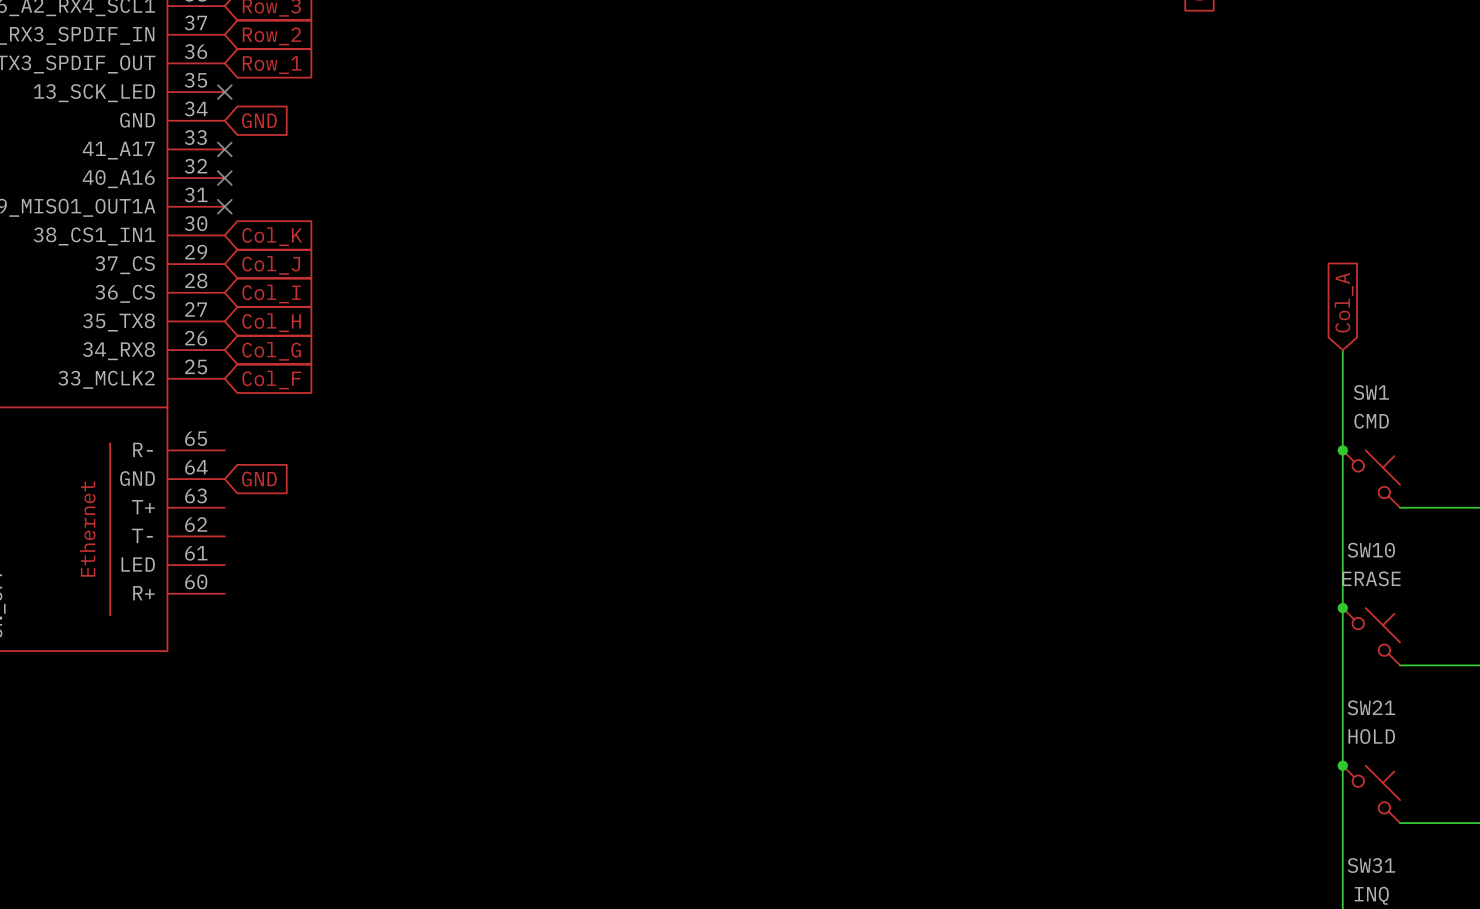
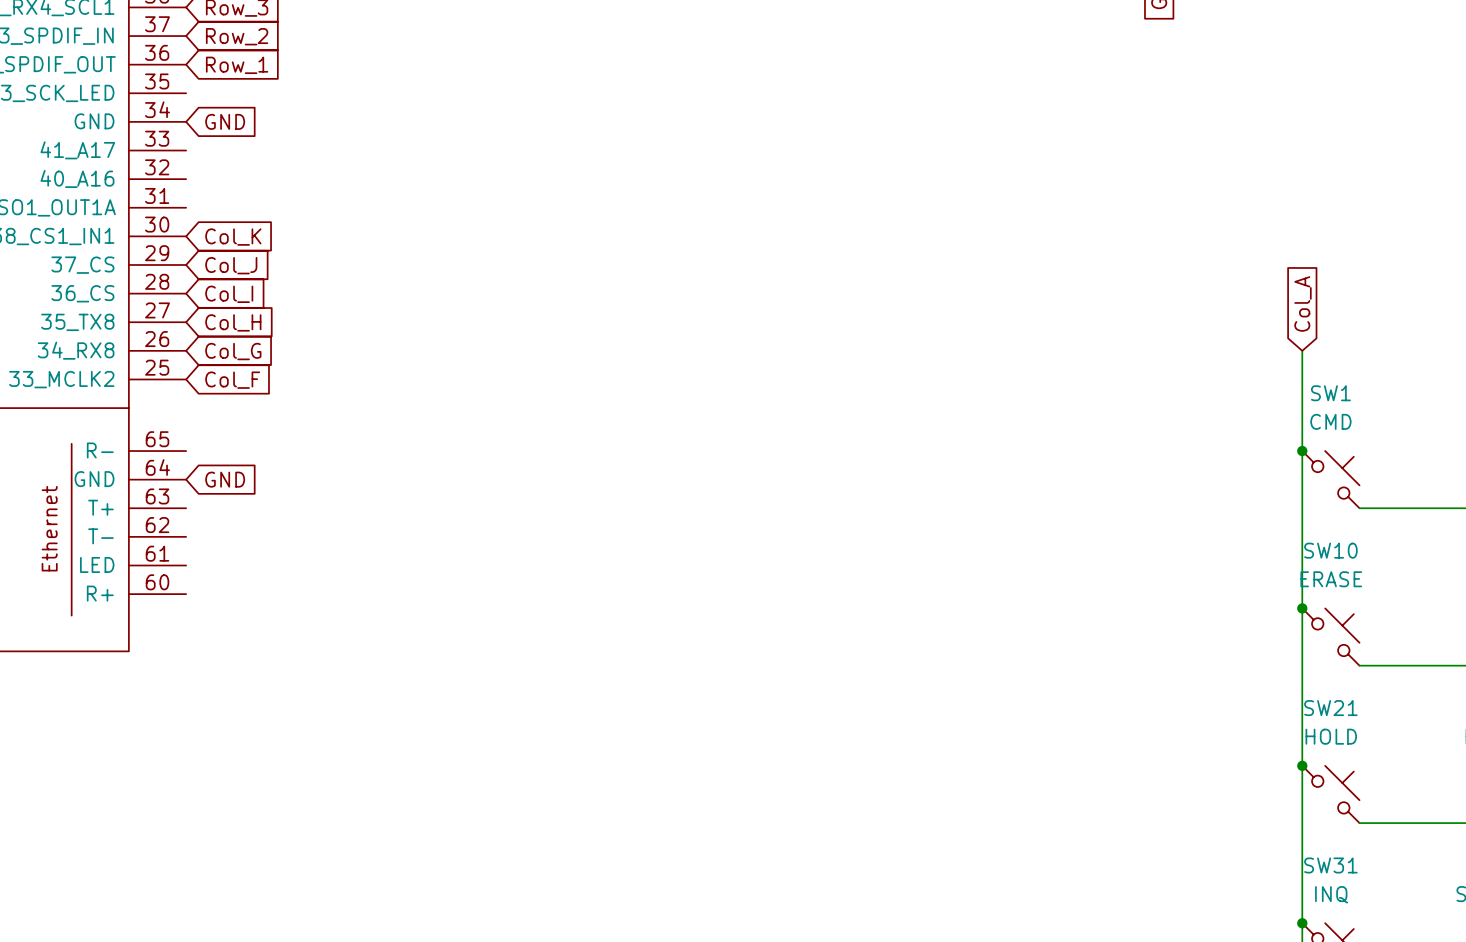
no-connect mark: (224, 92) -> none
no-connect mark: (224, 149) -> none
no-connect mark: (224, 178) -> none
no-connect mark: (224, 206) -> none

